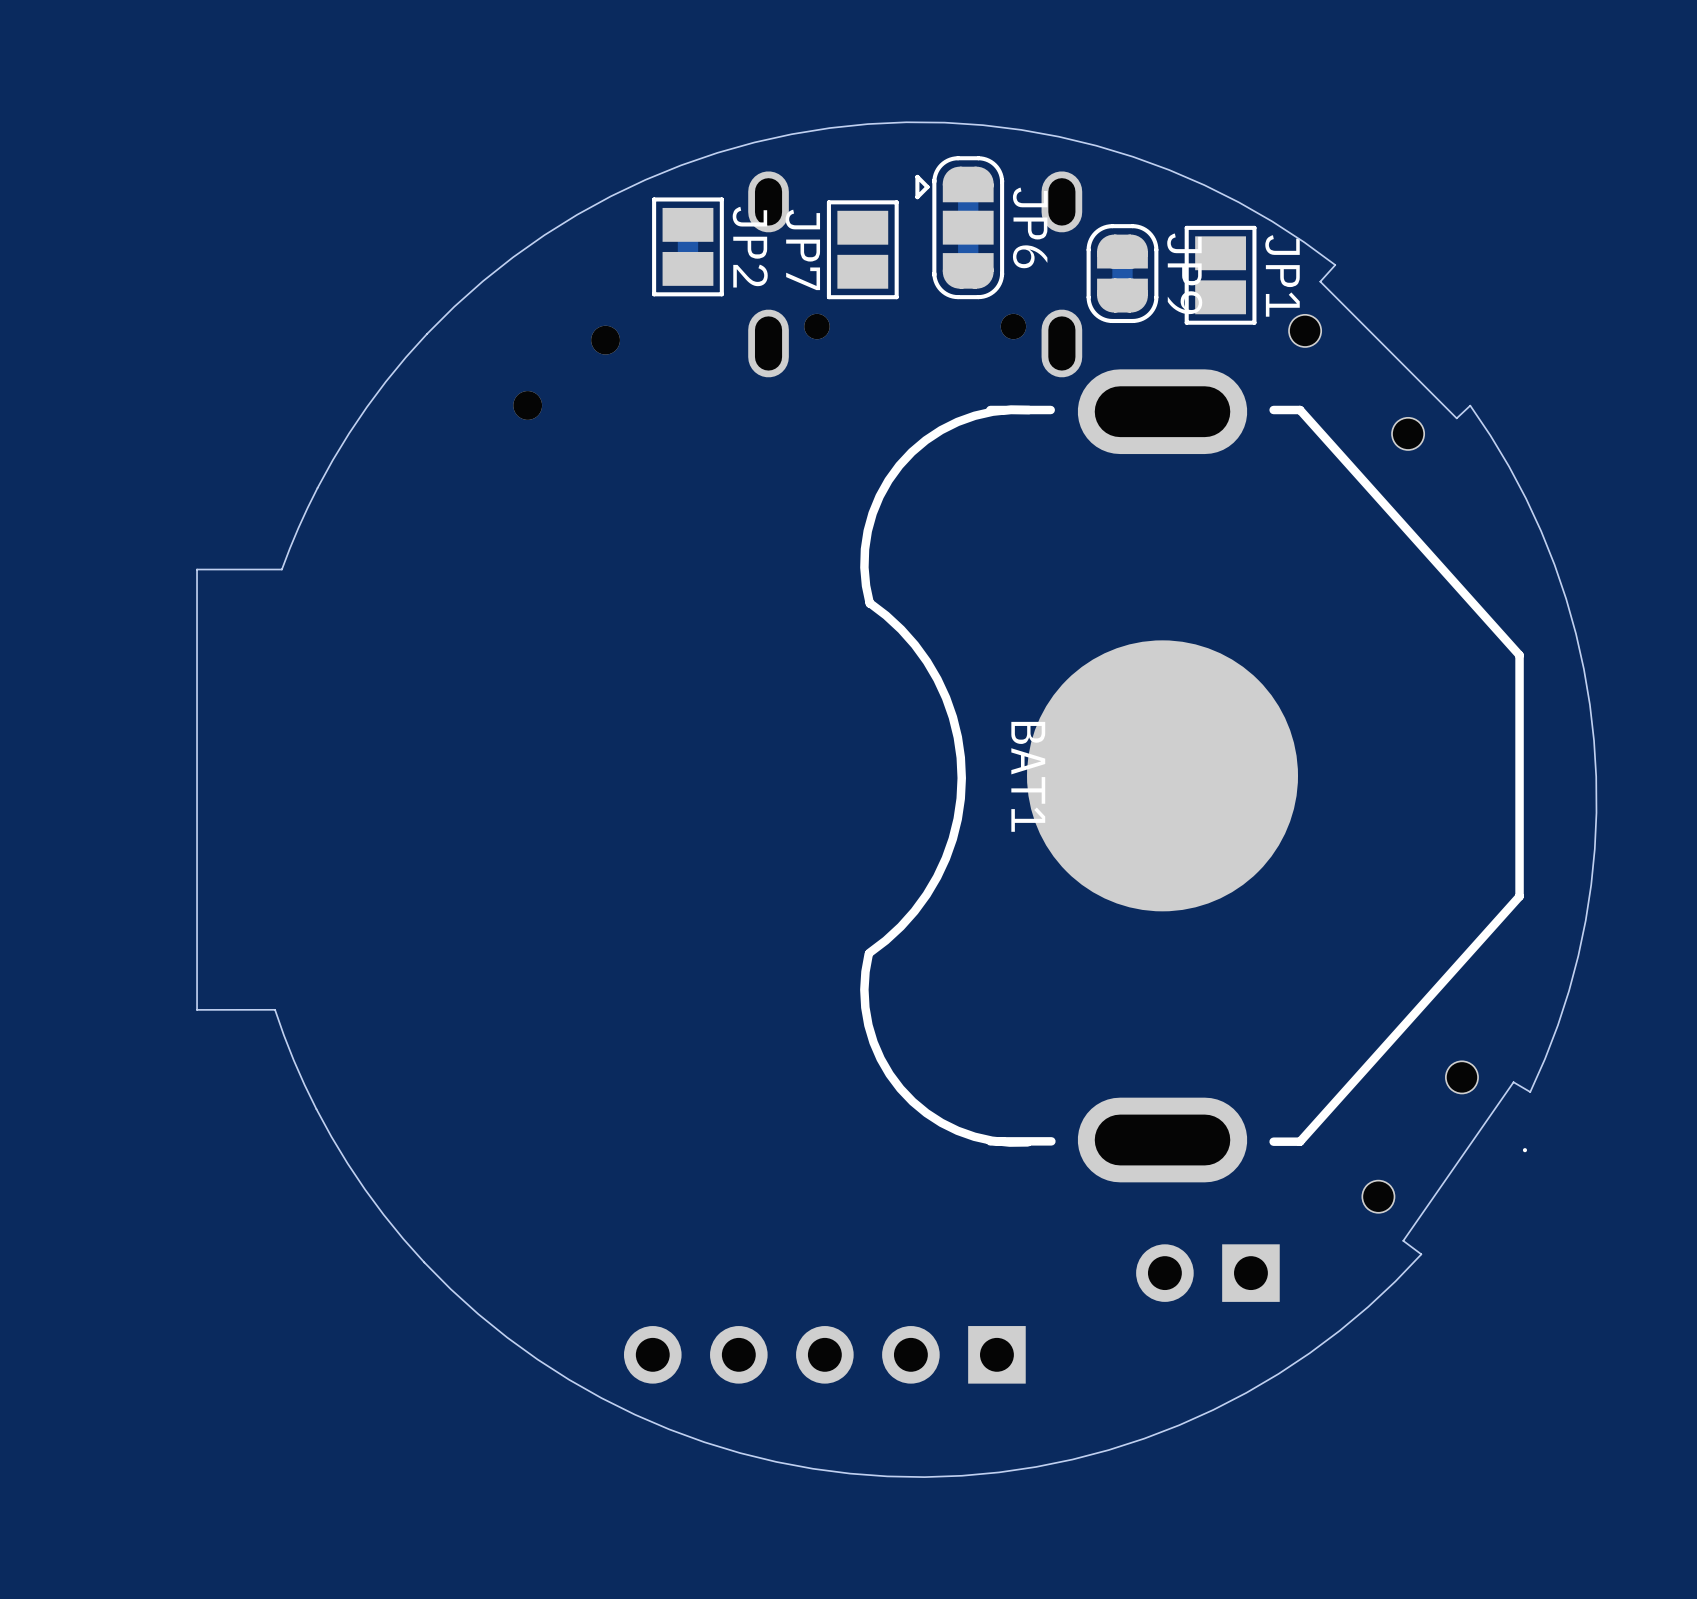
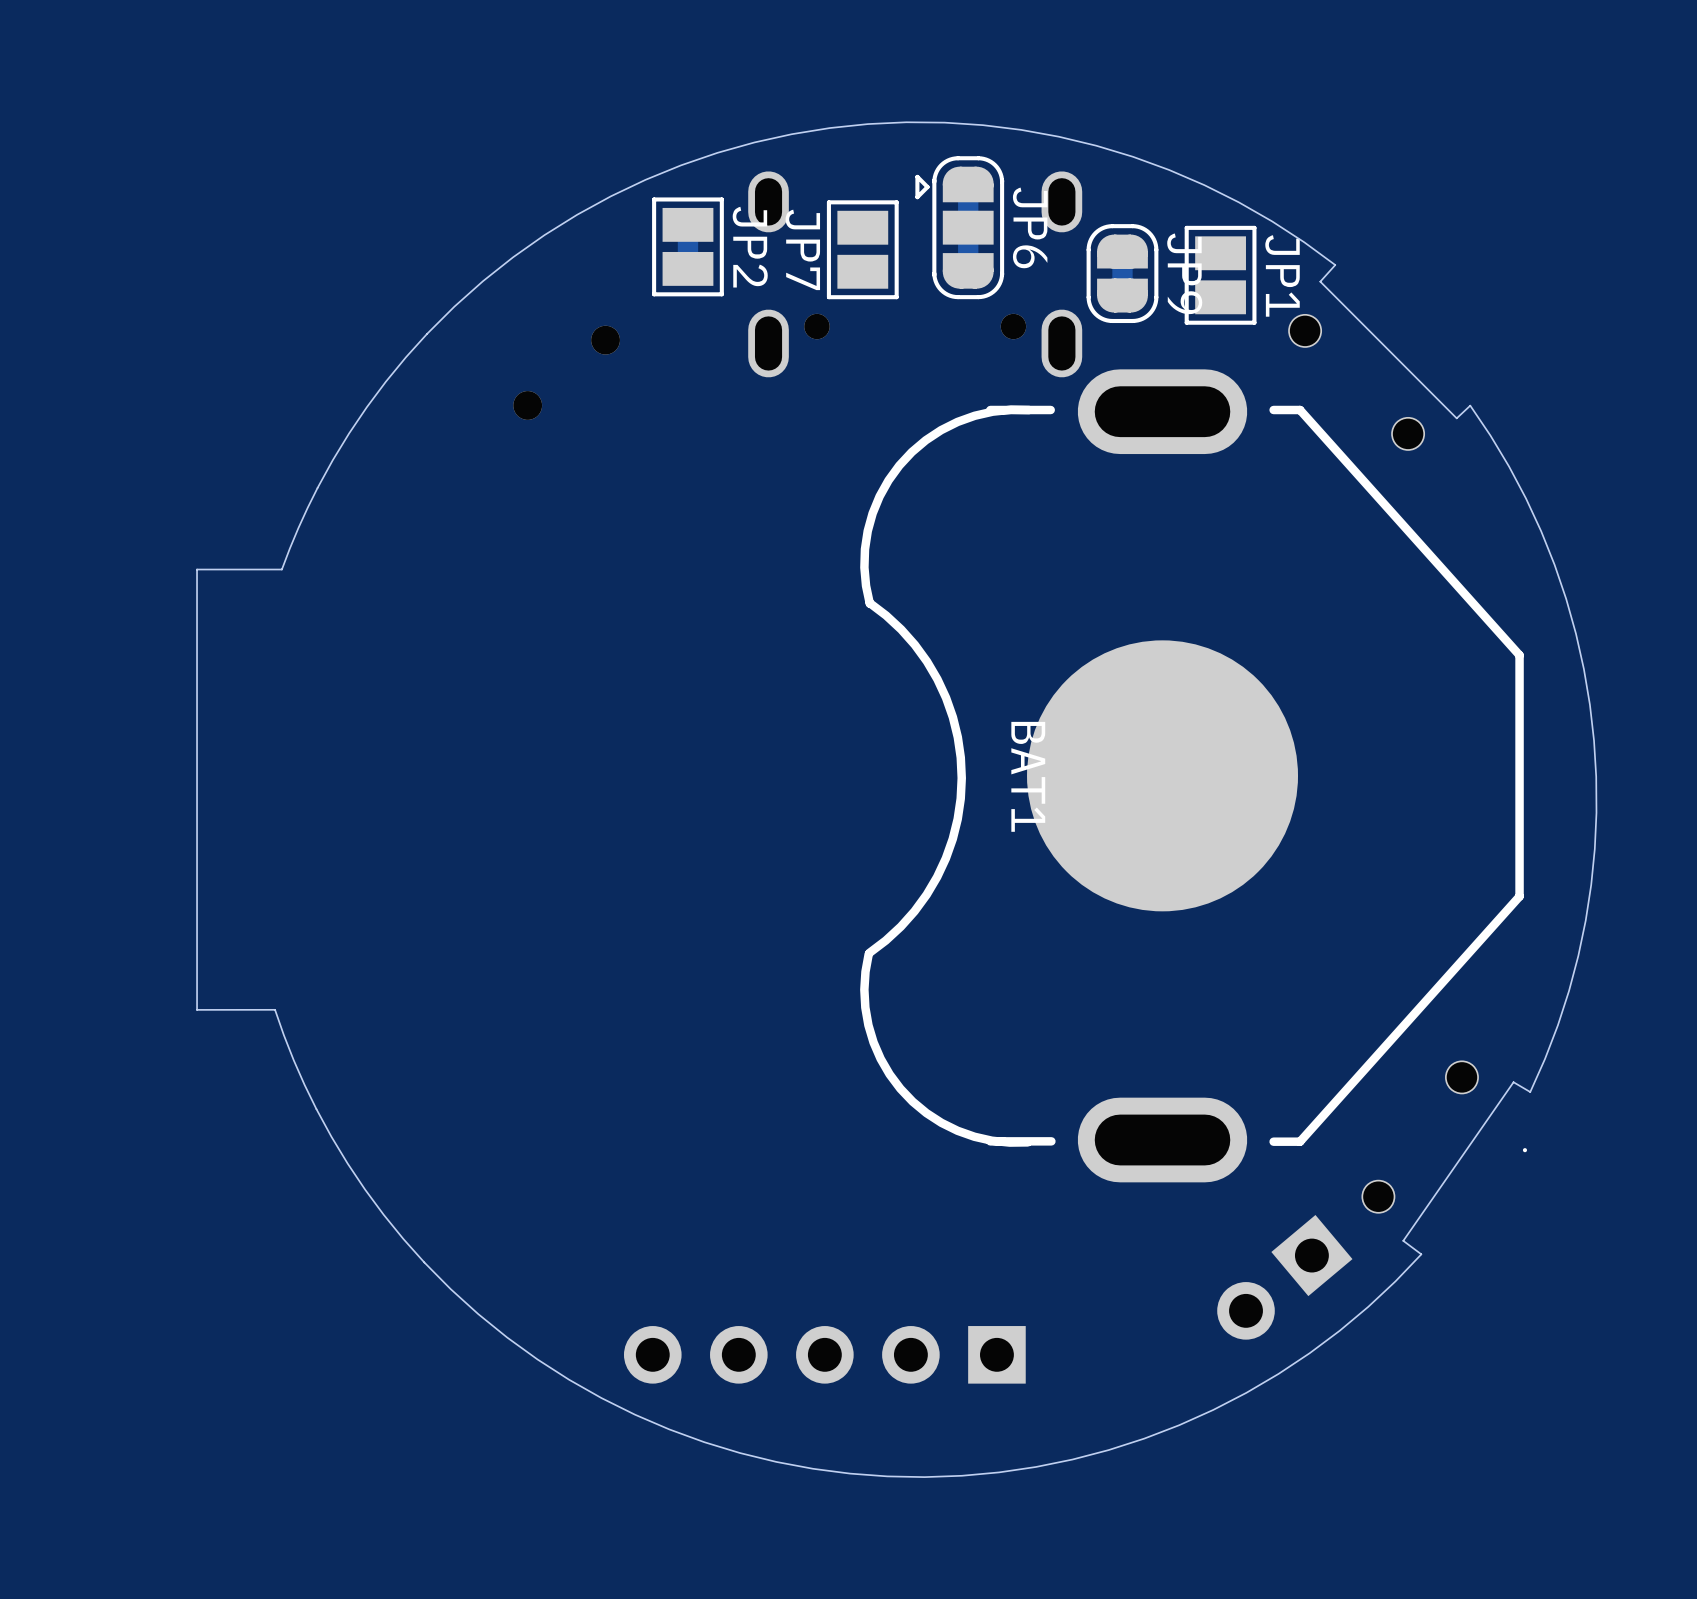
part: (1207, 1273) -> none
part: none -> (1284, 1277)

